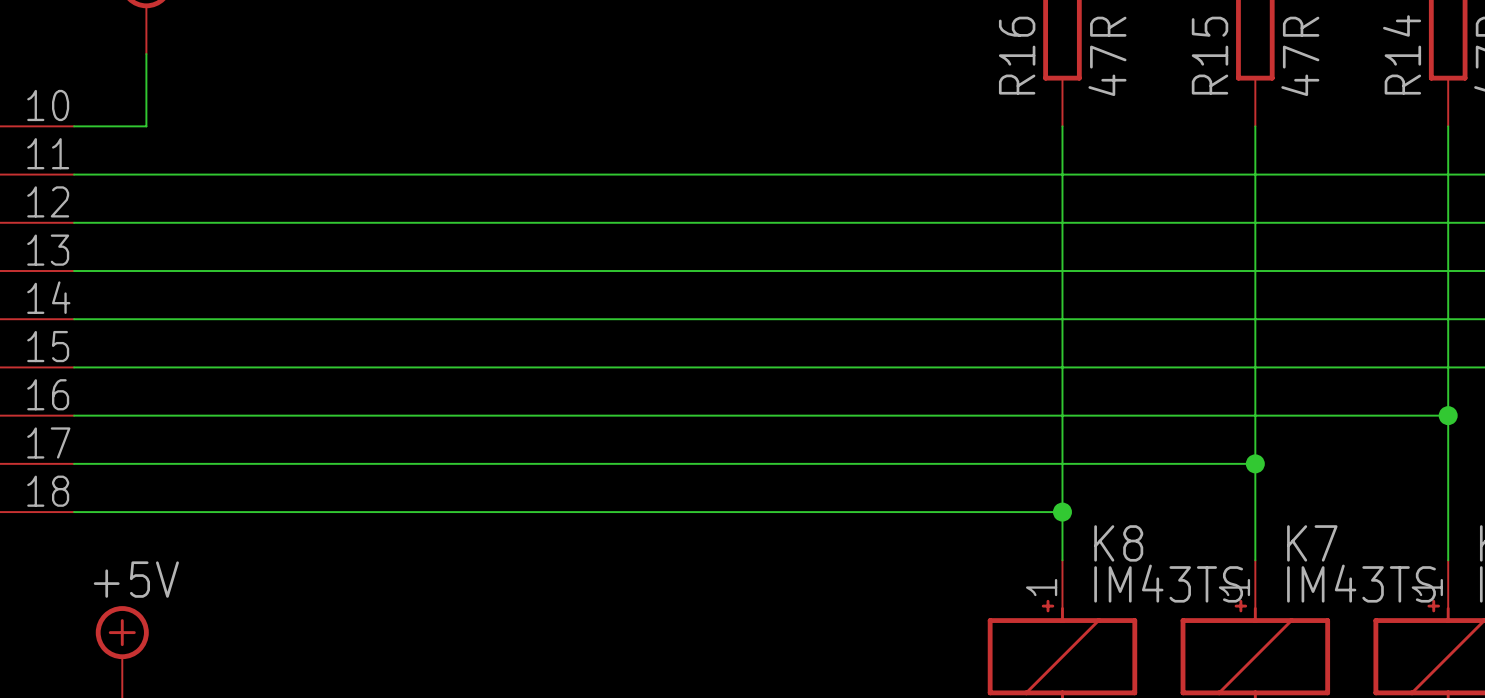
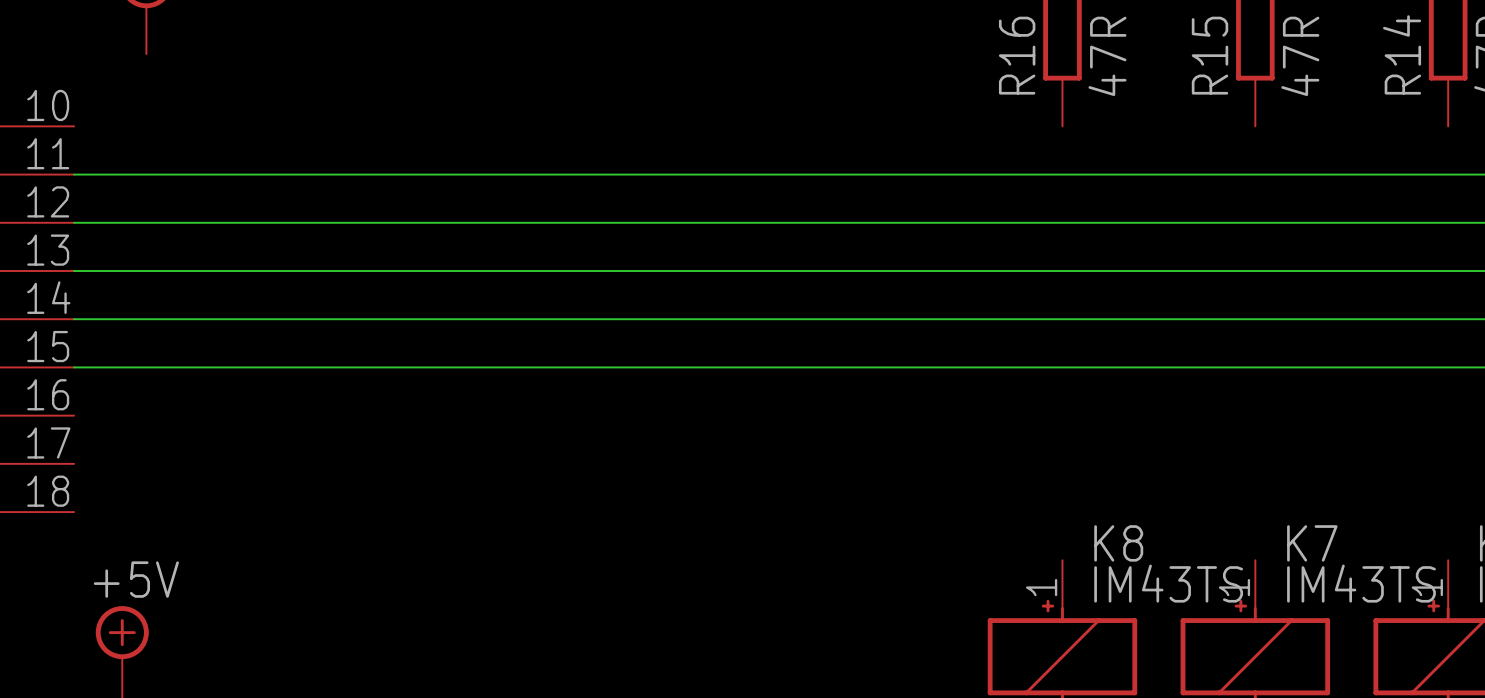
wire: (146, 54) (146, 126) (74, 126) -> none
wire: (1062, 126) (1062, 560) -> none
wire: (1255, 126) (1255, 560) -> none
wire: (1448, 126) (1448, 560) -> none
wire: (74, 415) (1448, 415) -> none
junction: (1448, 415) -> none
wire: (74, 463) (1255, 463) -> none
junction: (1255, 463) -> none
wire: (74, 512) (1062, 512) -> none
junction: (1062, 512) -> none

